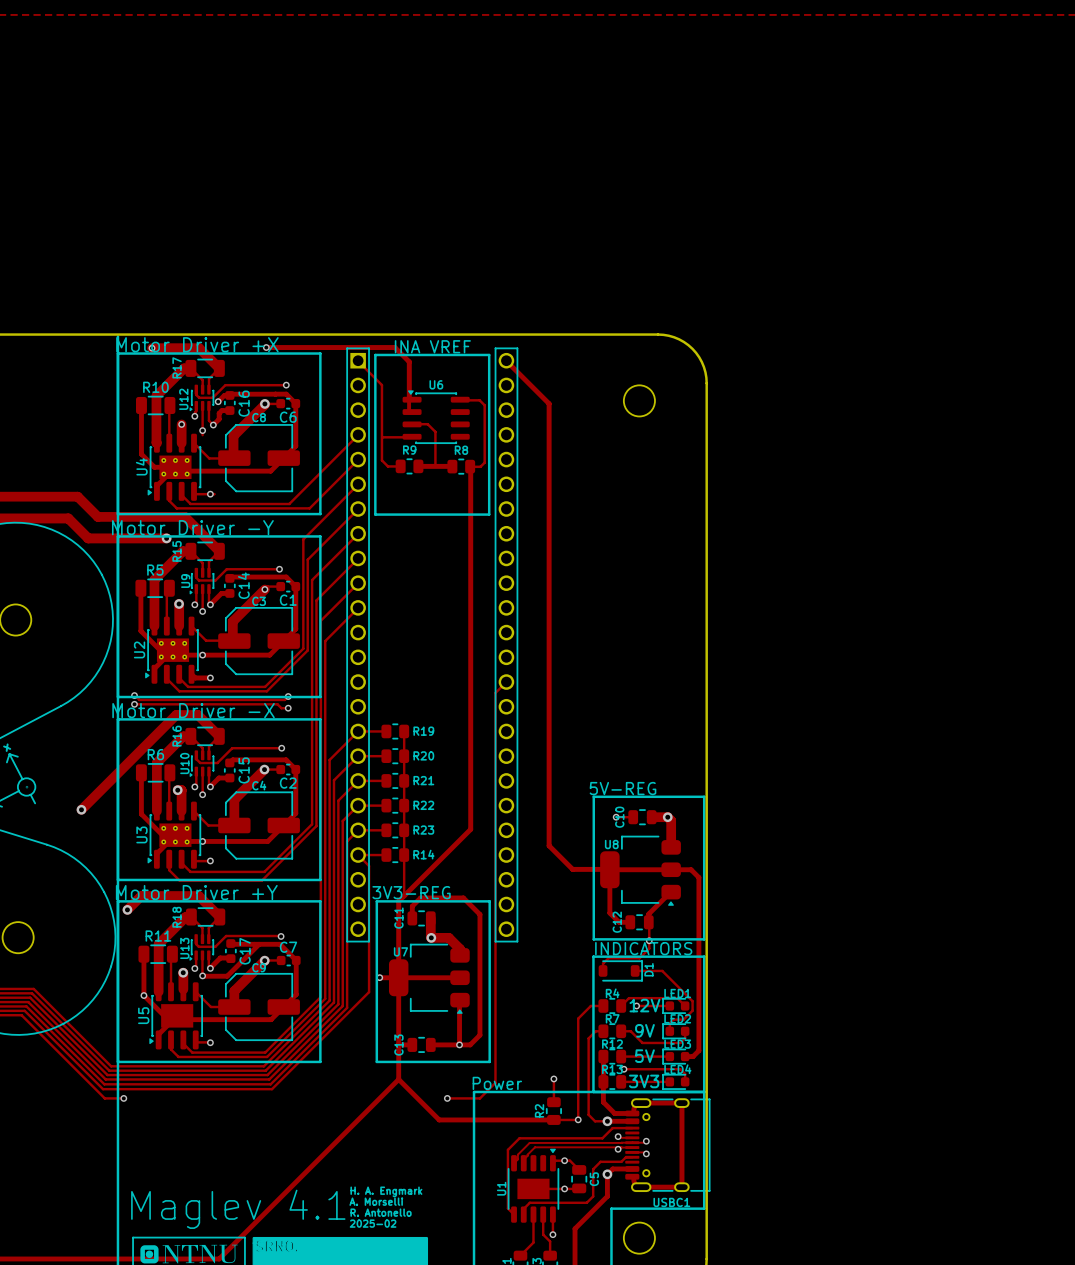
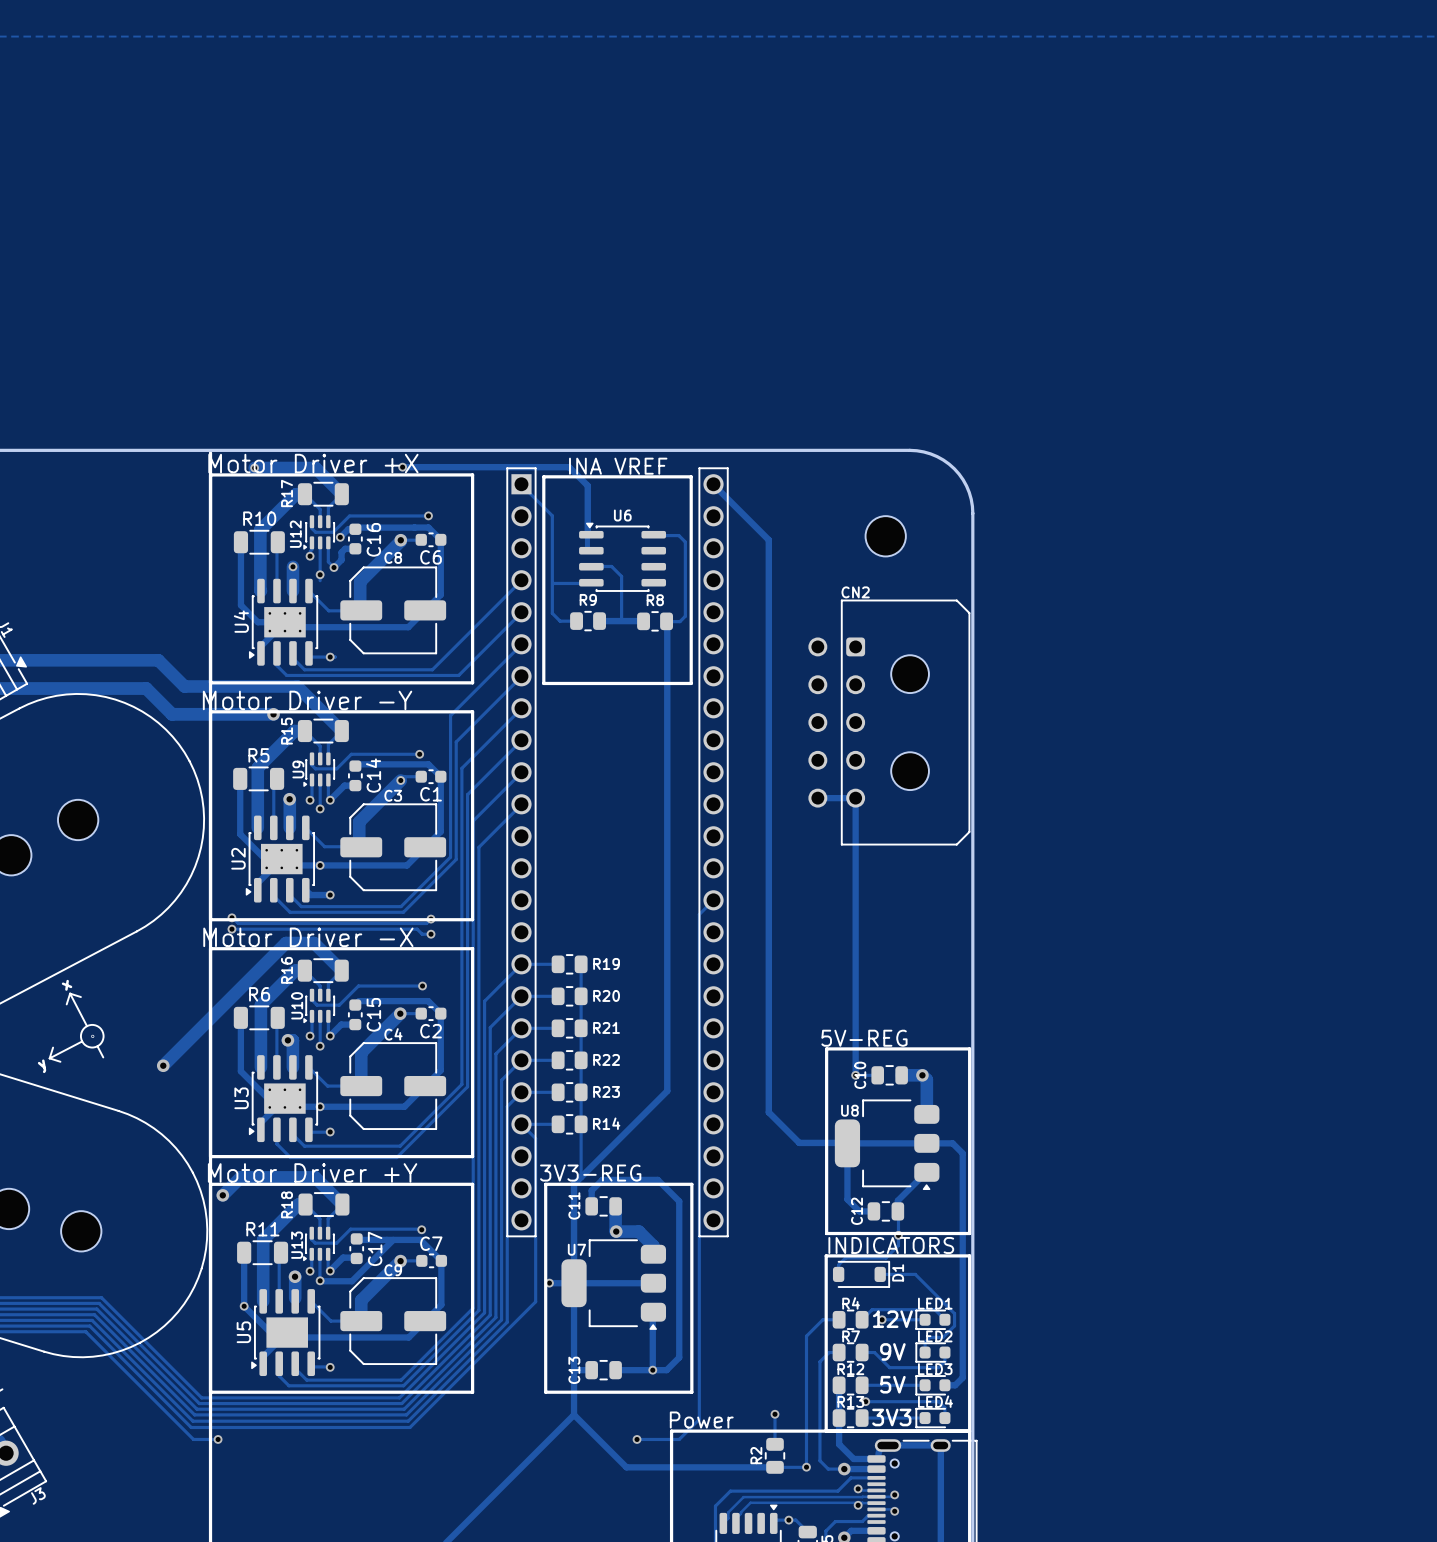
CN2: none -> (889, 722)
track: none -> (817, 798) (855, 798) (855, 1075)

